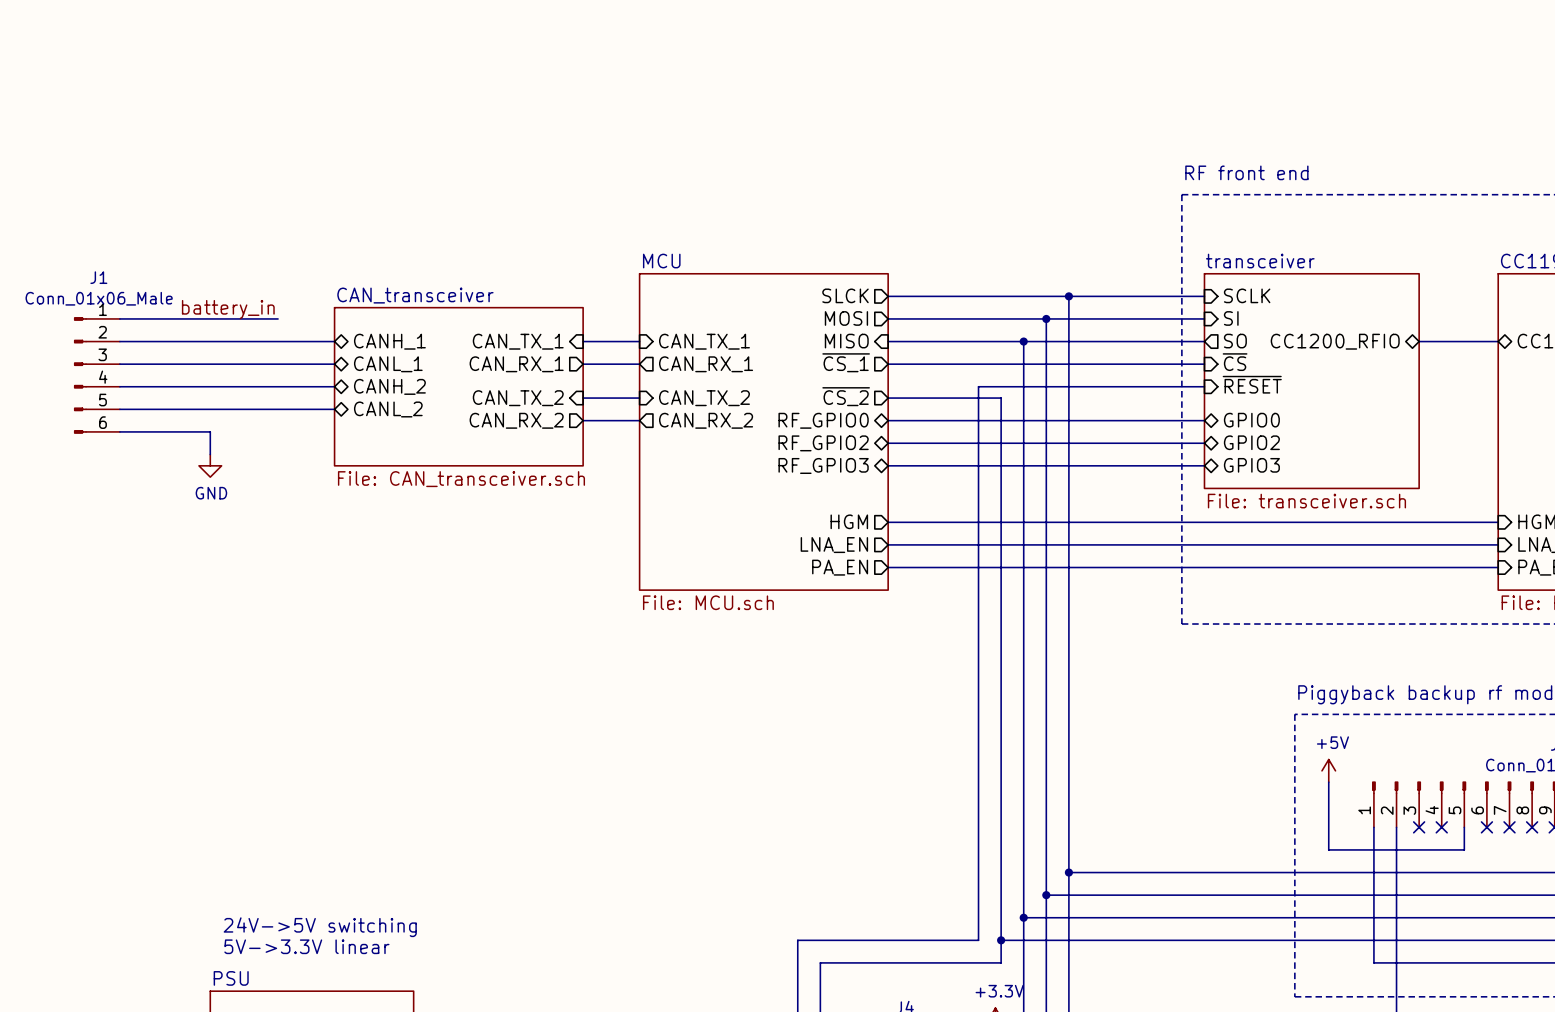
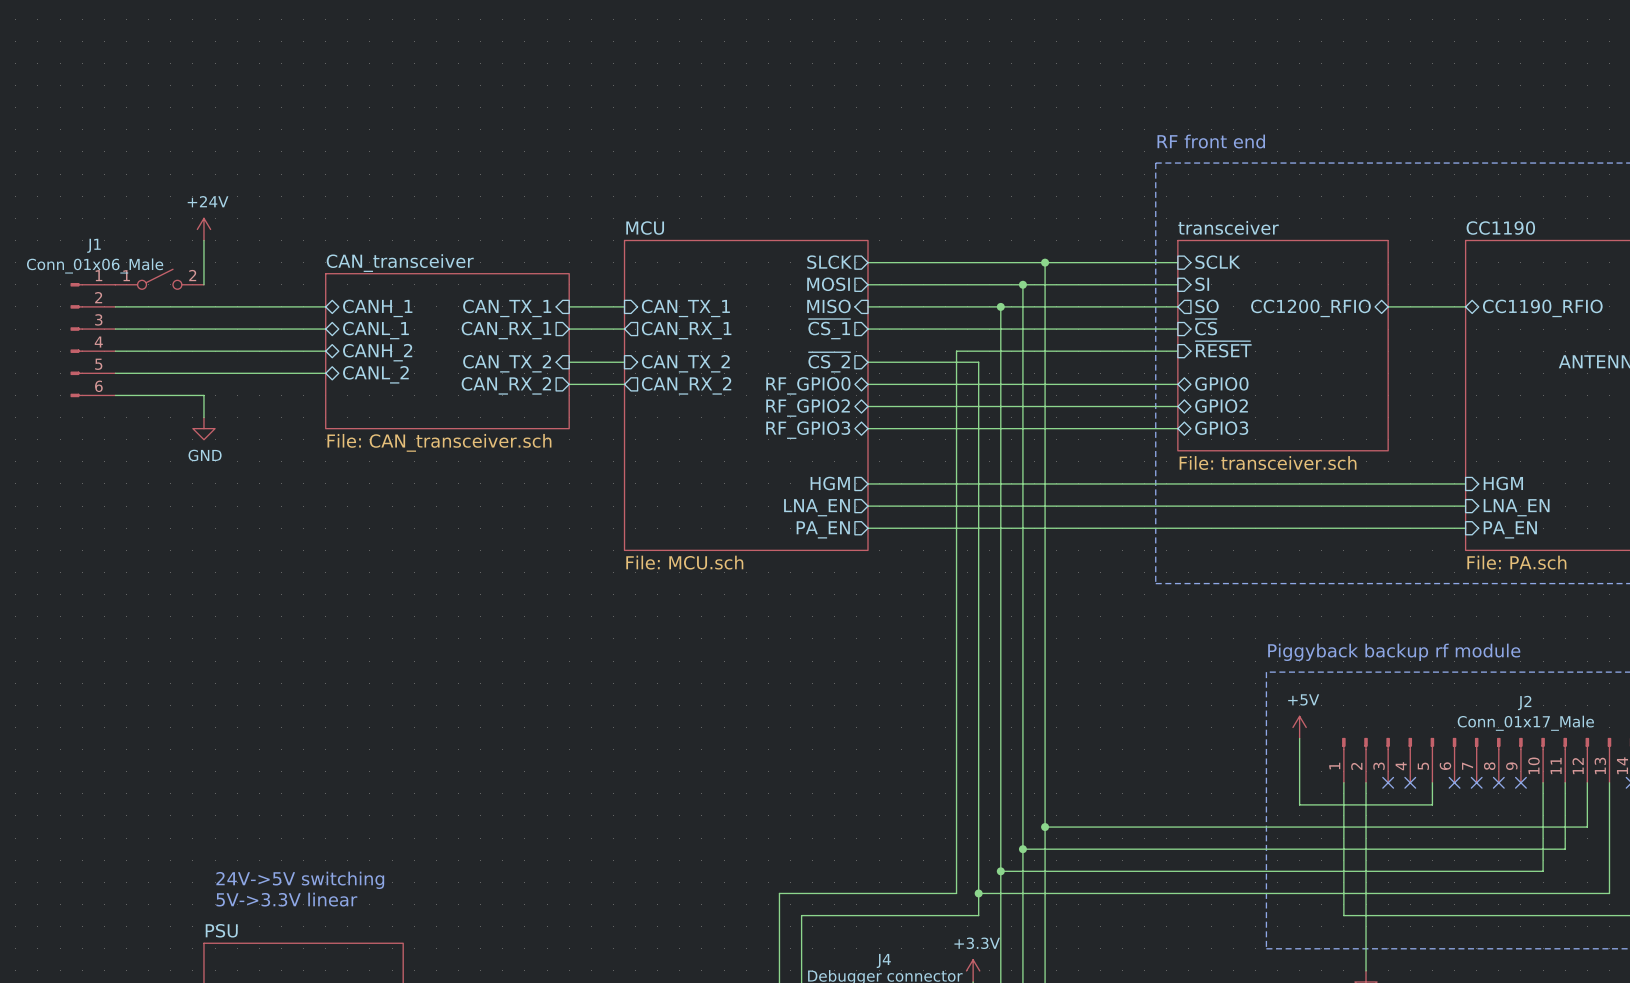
power symbol: none -> +24V (203, 229)
wire: none -> (203, 240) (203, 284)
label: battery_in (228, 309) -> none
part: none -> (159, 279)
wire: (119, 318) (278, 318) -> none

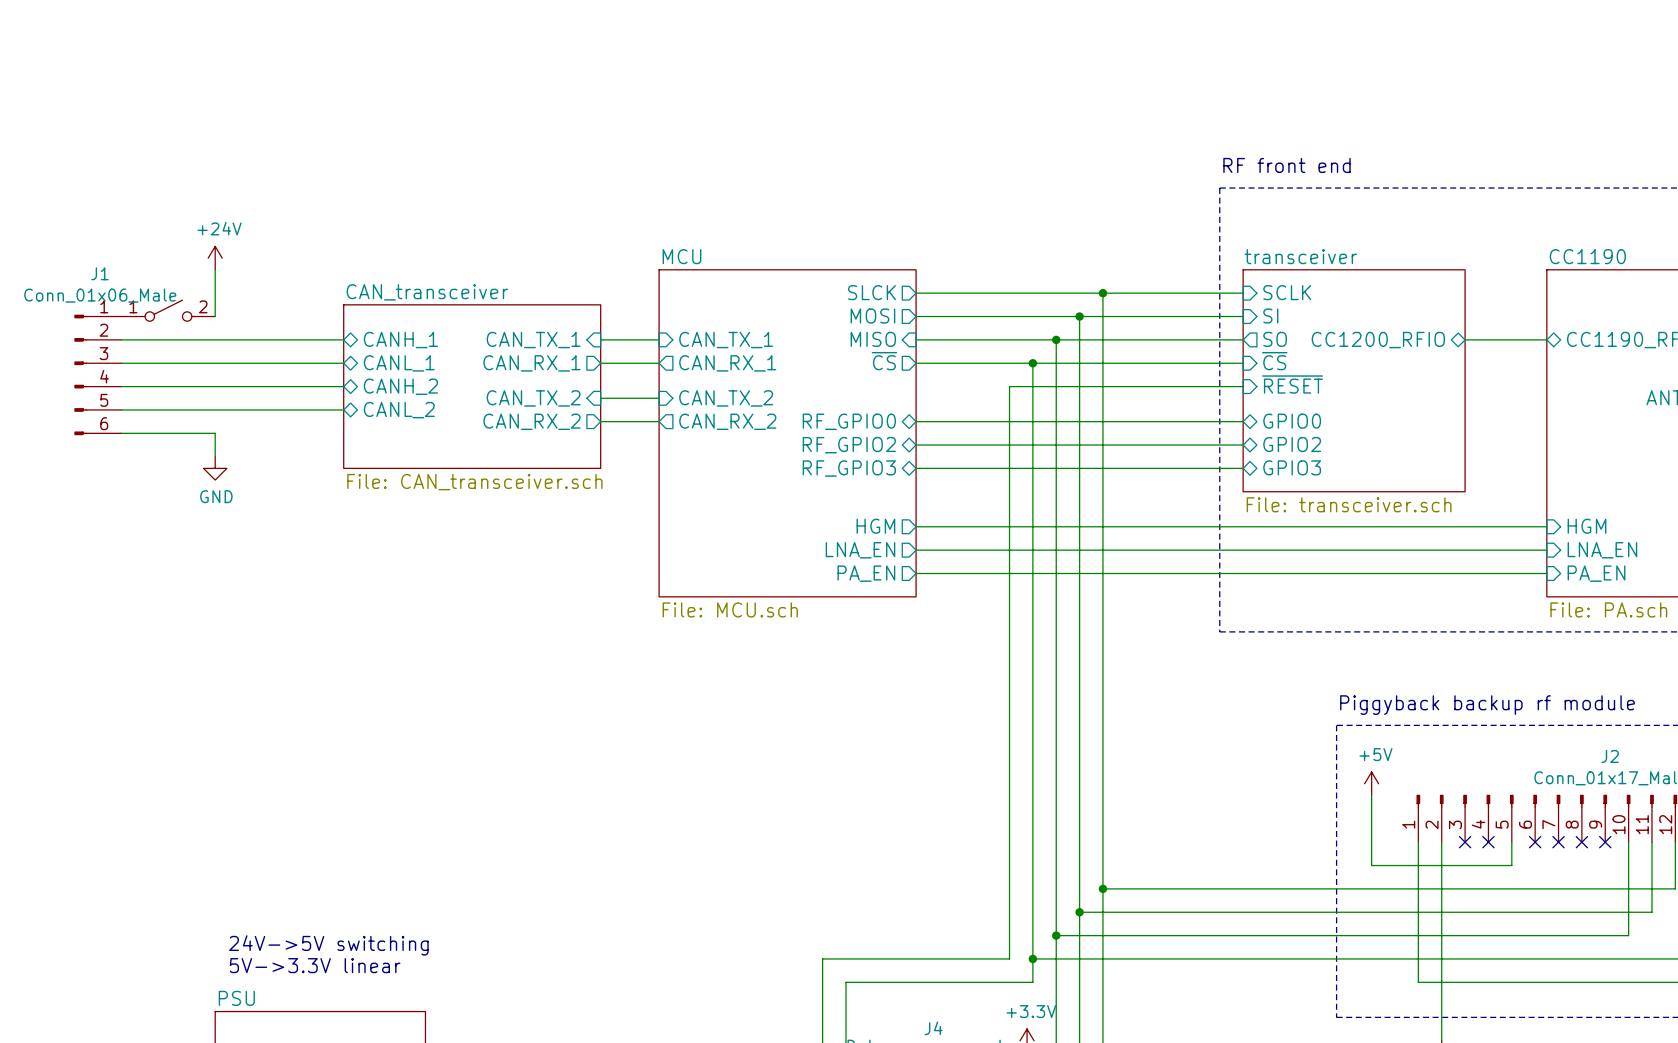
sheet pin: ~{CS_1} (829, 329) -> ~{CS} (884, 361)
junction: none -> (1032, 363)
sheet pin: ~{CS_2} (829, 362) -> none
wire: (868, 362) (978, 362) -> (1032, 363) (1032, 398)

